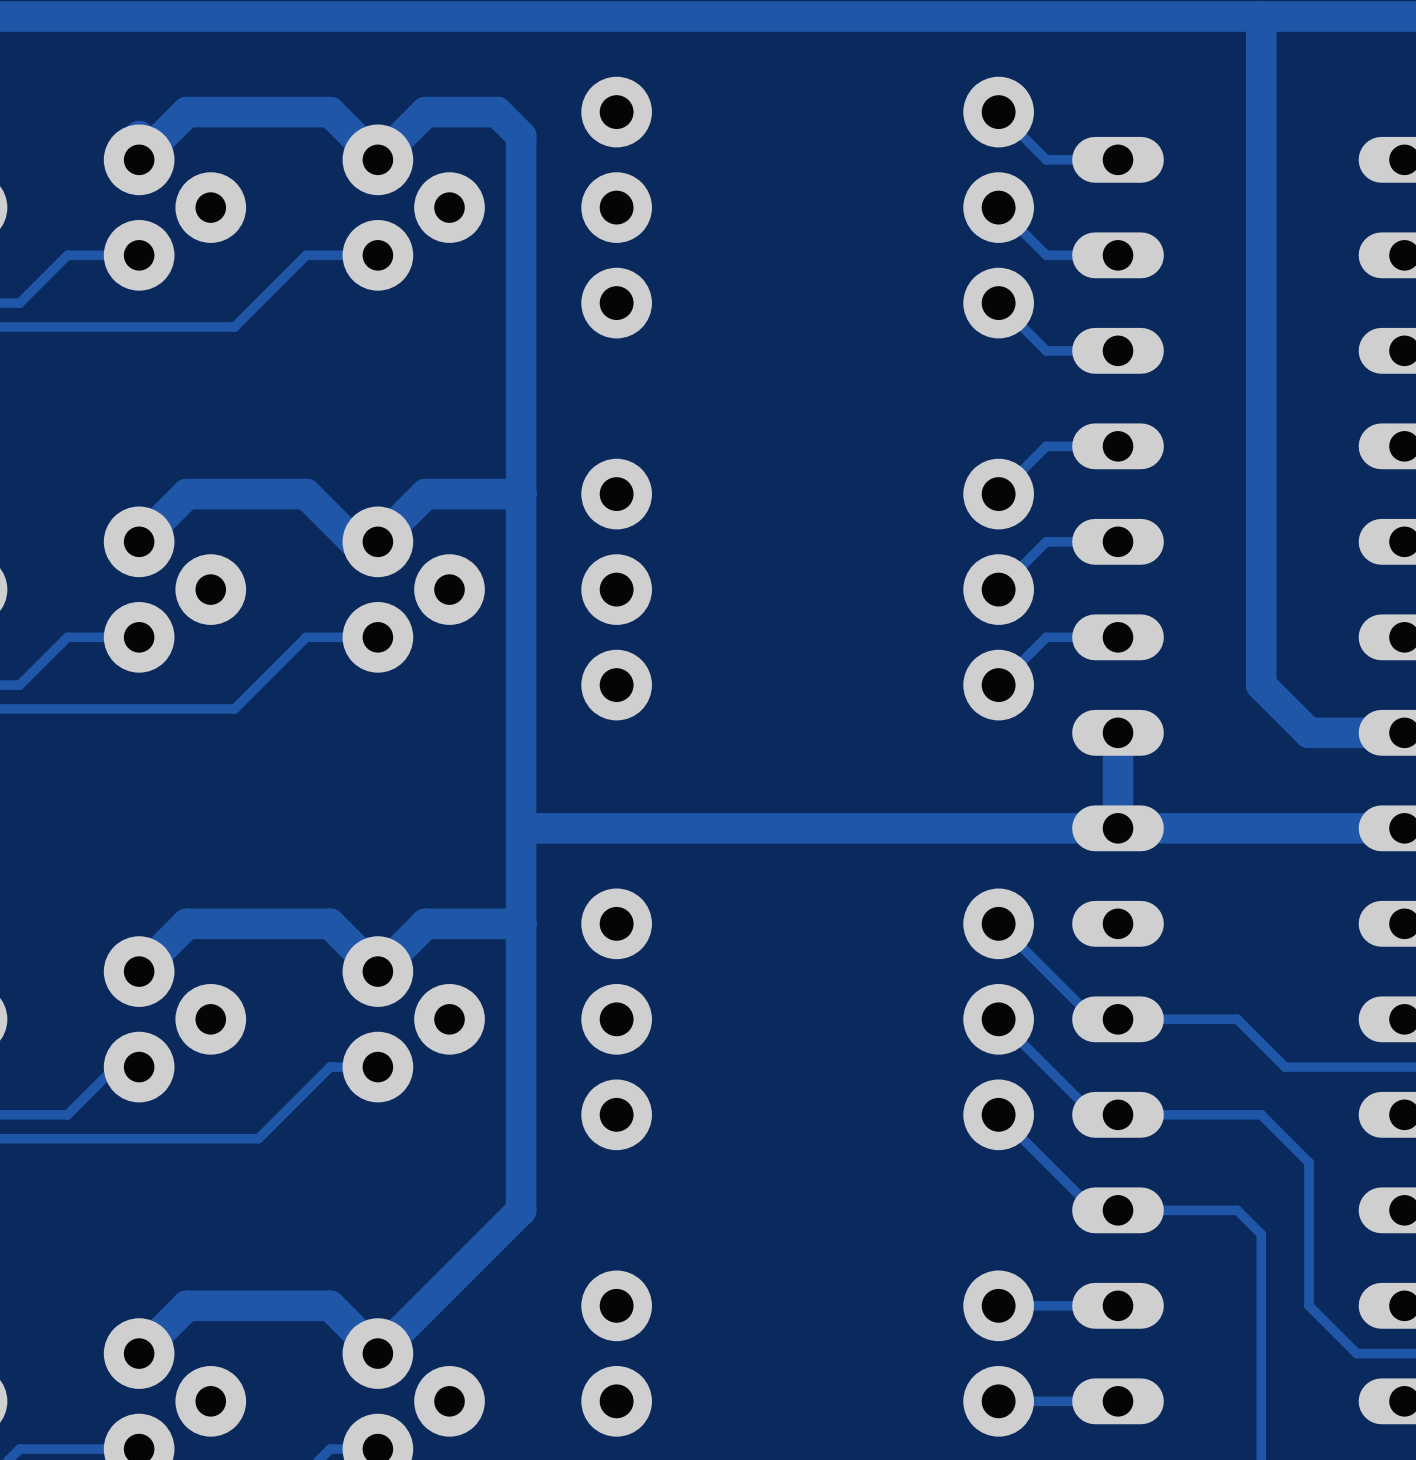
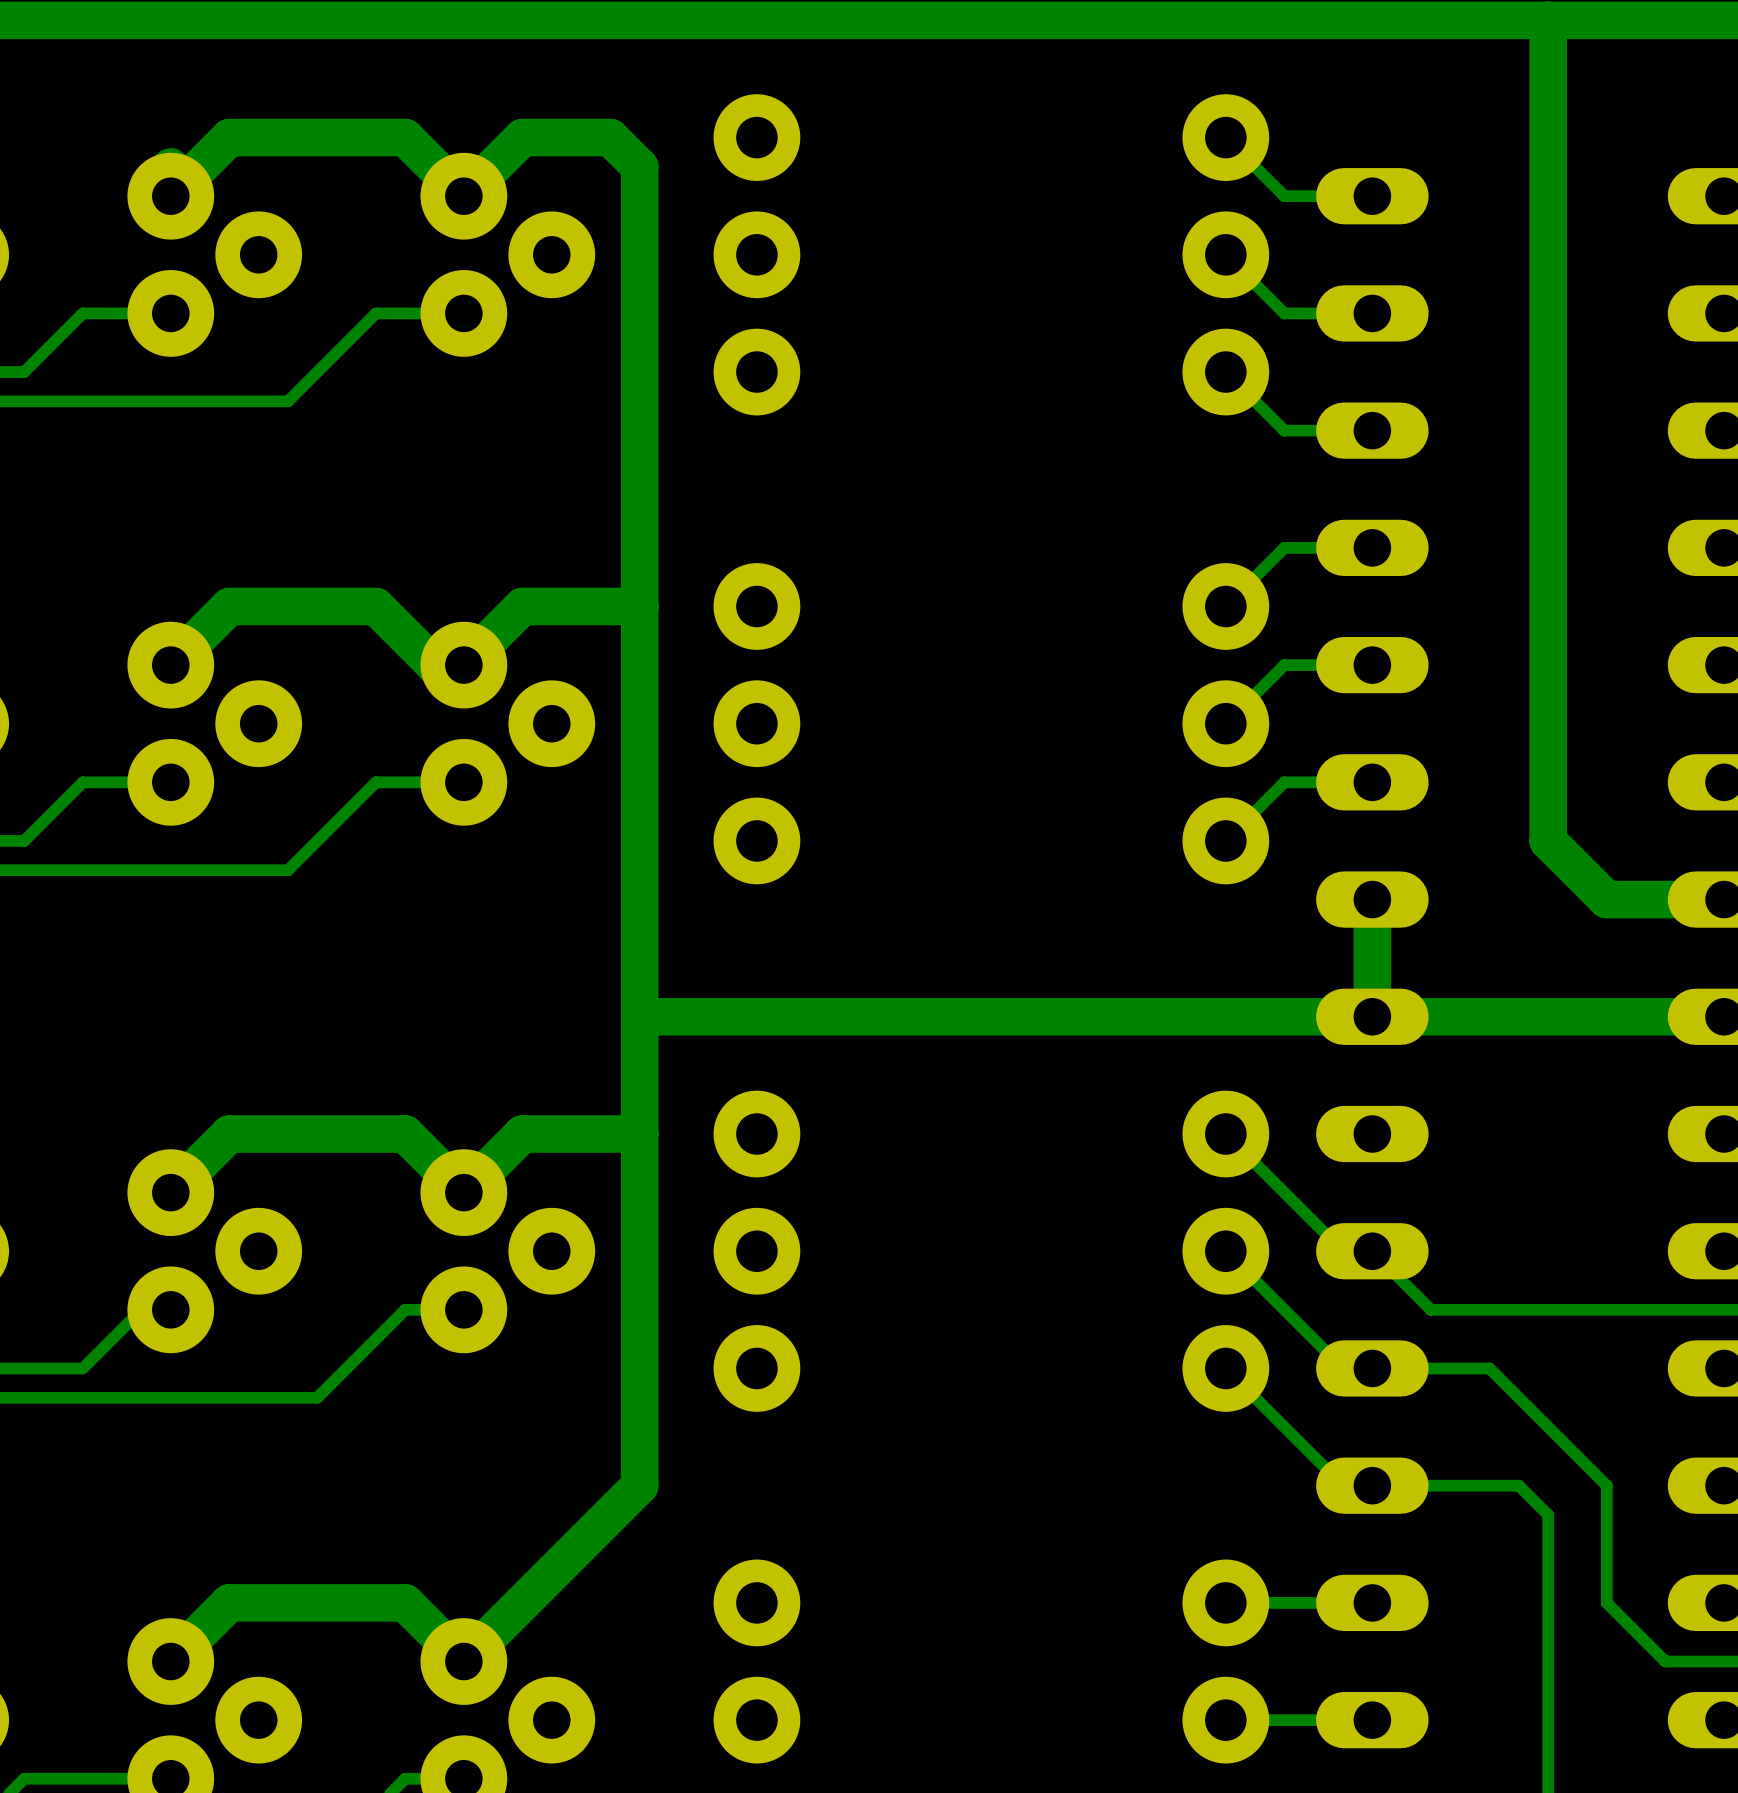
track: (1118, 1019) (1237, 1019) (1285, 1067) -> (1372, 1251) (1430, 1309) (1577, 1309)
track: (1213, 1114) (1261, 1114) (1309, 1162) (1309, 1210) -> (1489, 1368) (1606, 1485)

